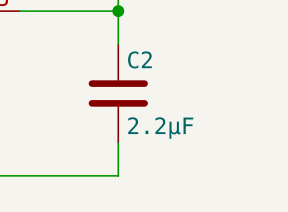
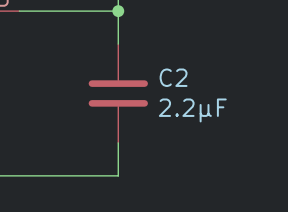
C2 name position: C2 (139, 59) -> C2 (173, 77)
C2 value position: 2.2μF (160, 128) -> 2.2μF (192, 110)

